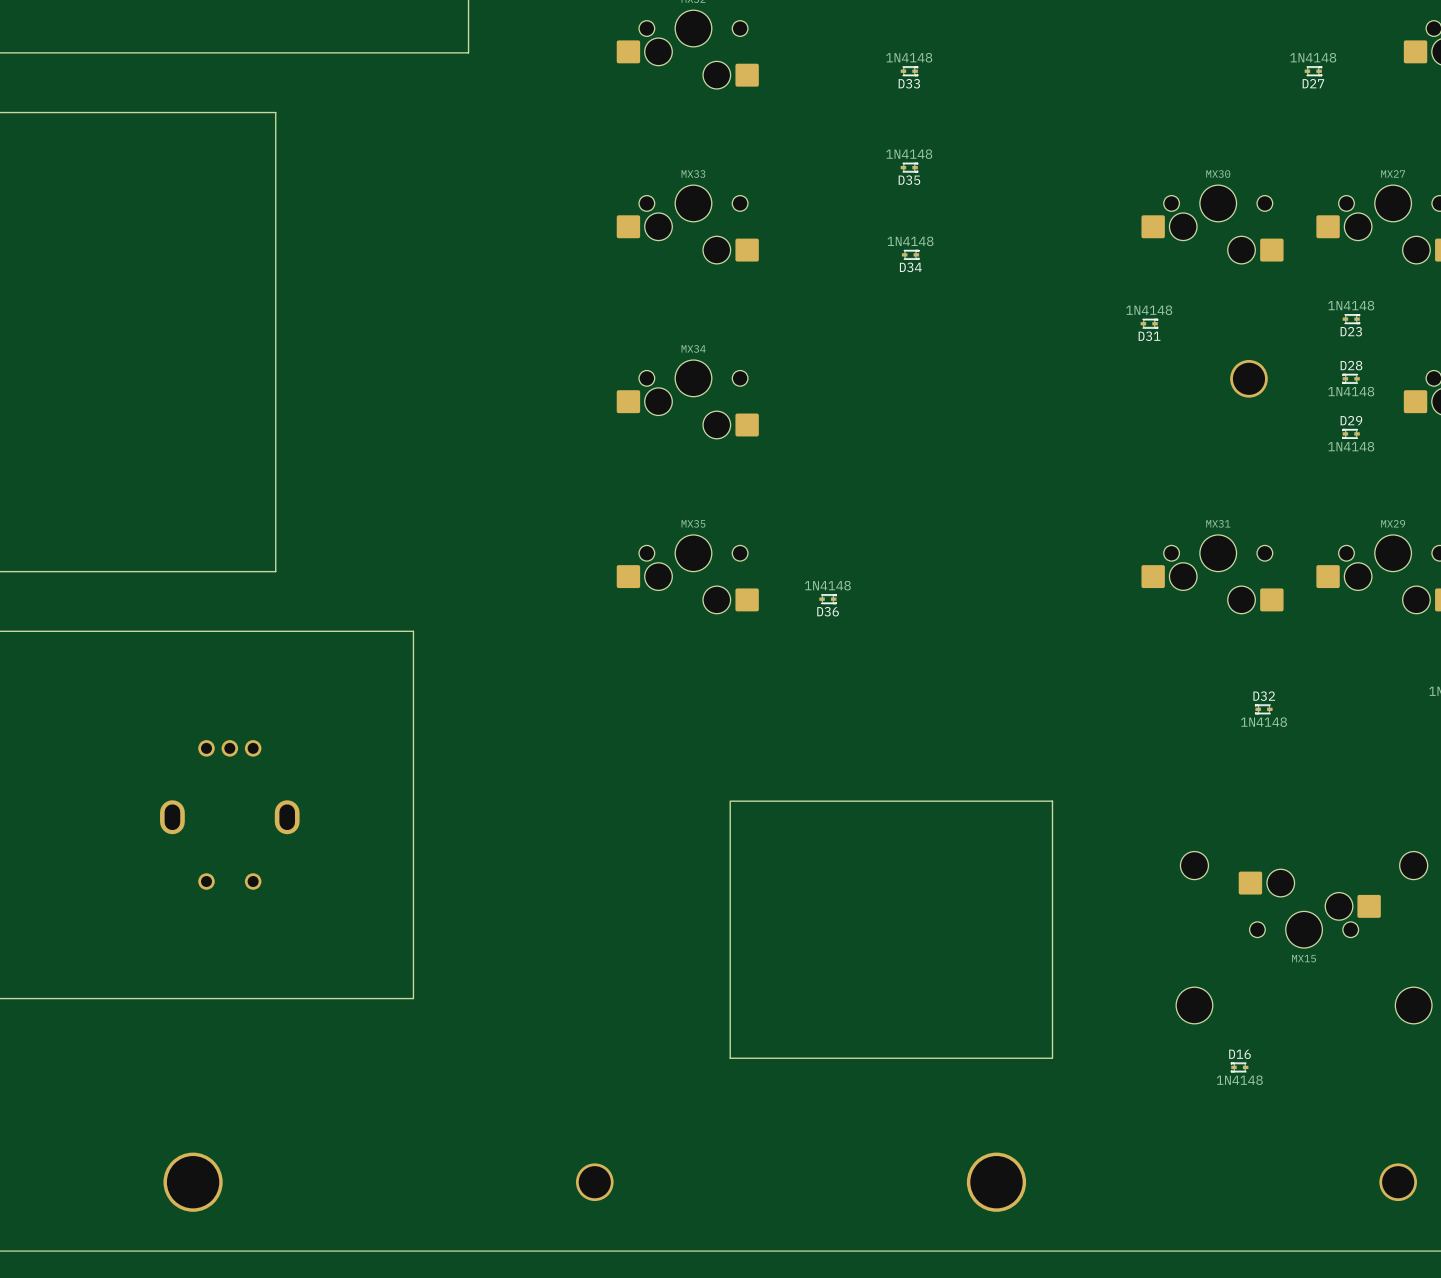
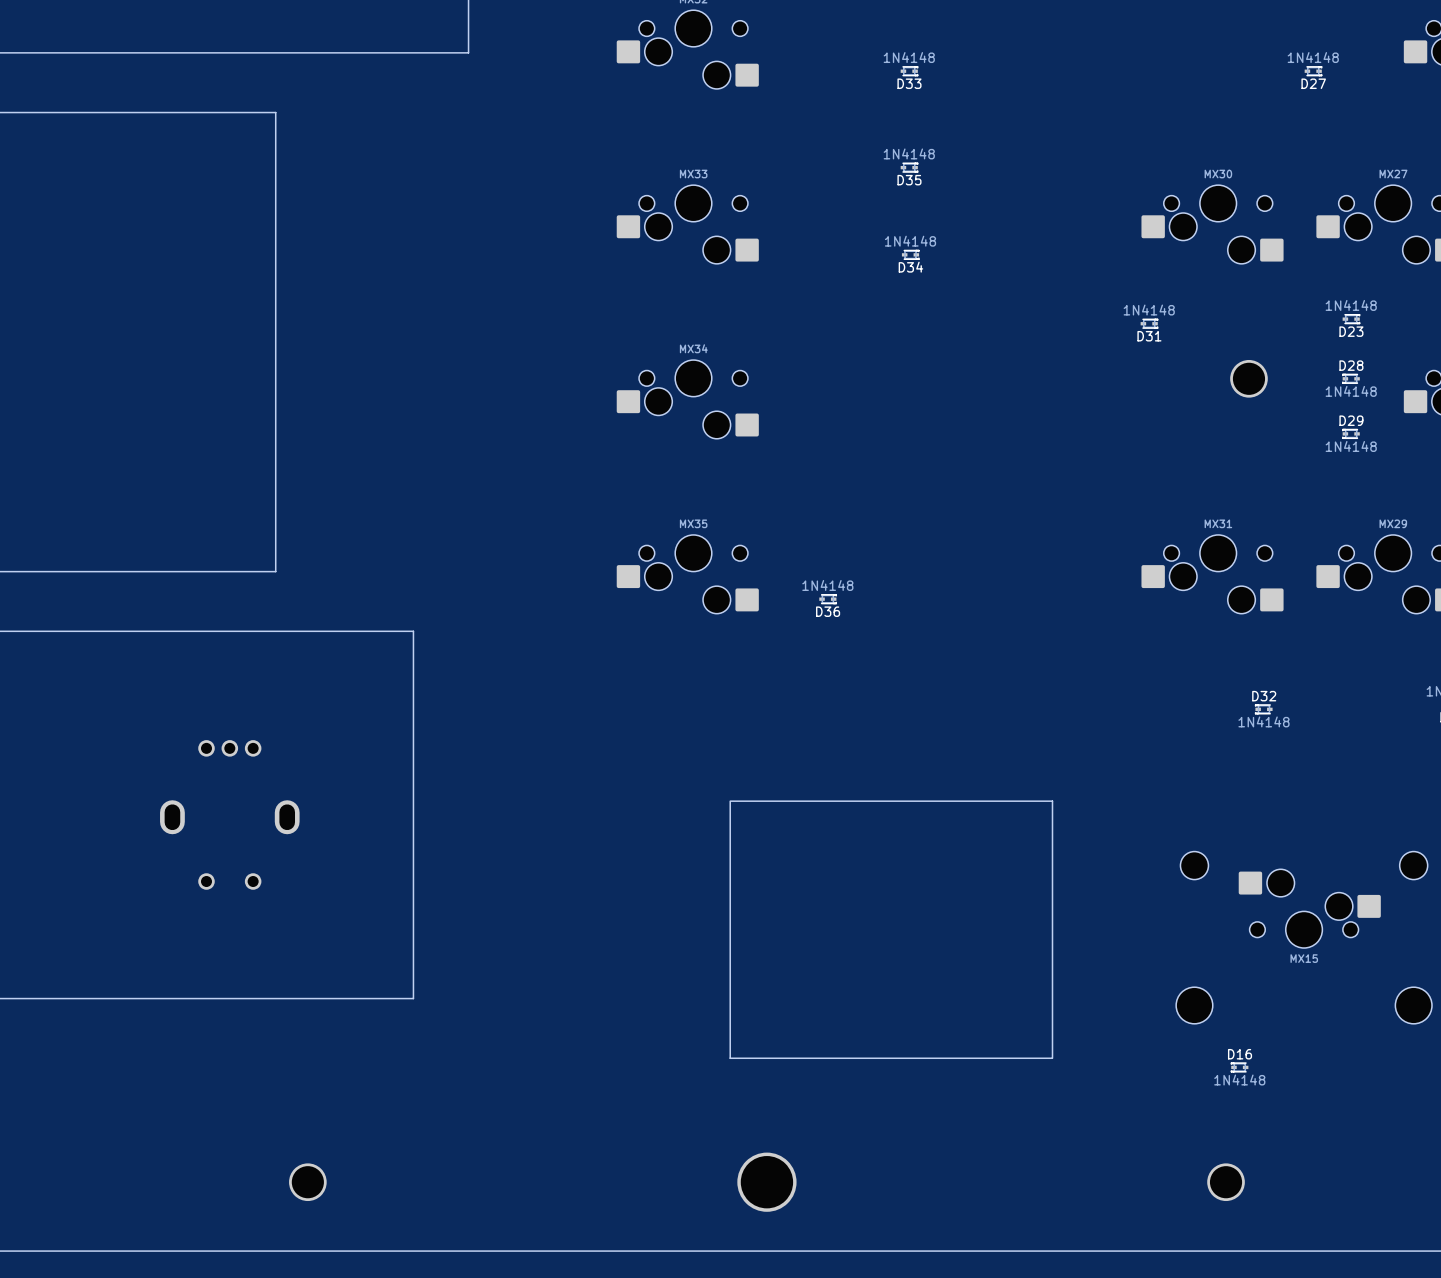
part: (193, 1182) -> none
part: none -> (307, 1182)
part: (594, 1182) -> none
part position: (996, 1182) -> (766, 1182)
part position: (1398, 1182) -> (1226, 1182)

